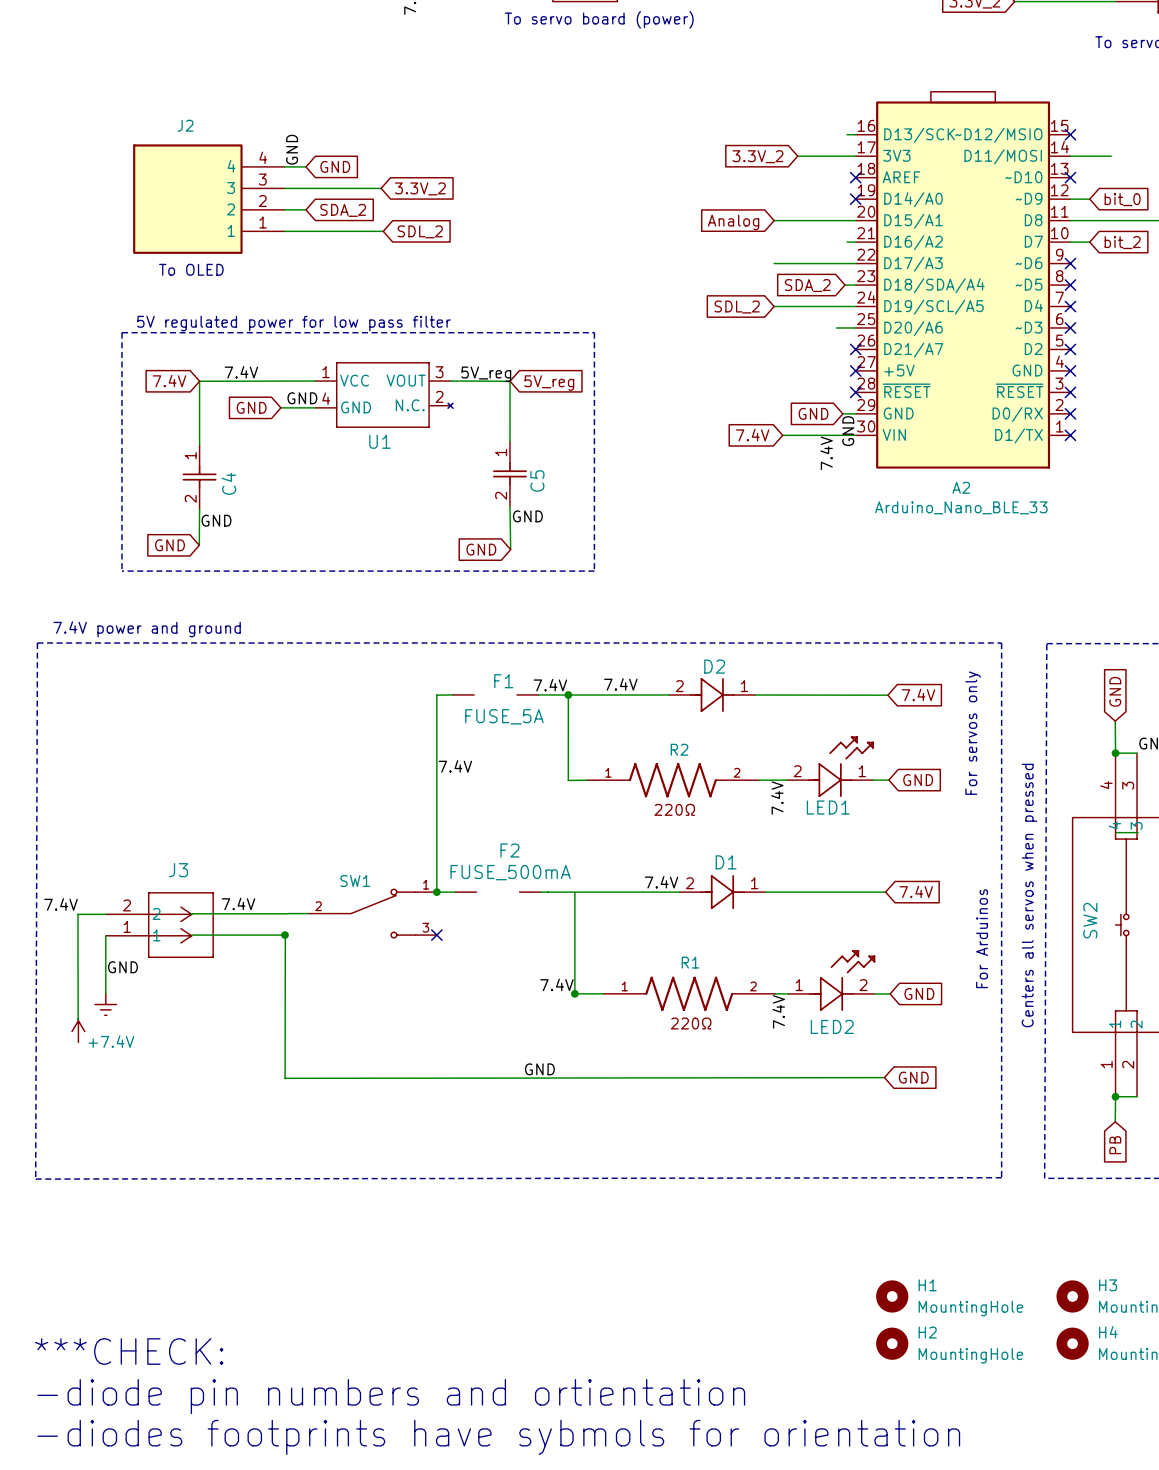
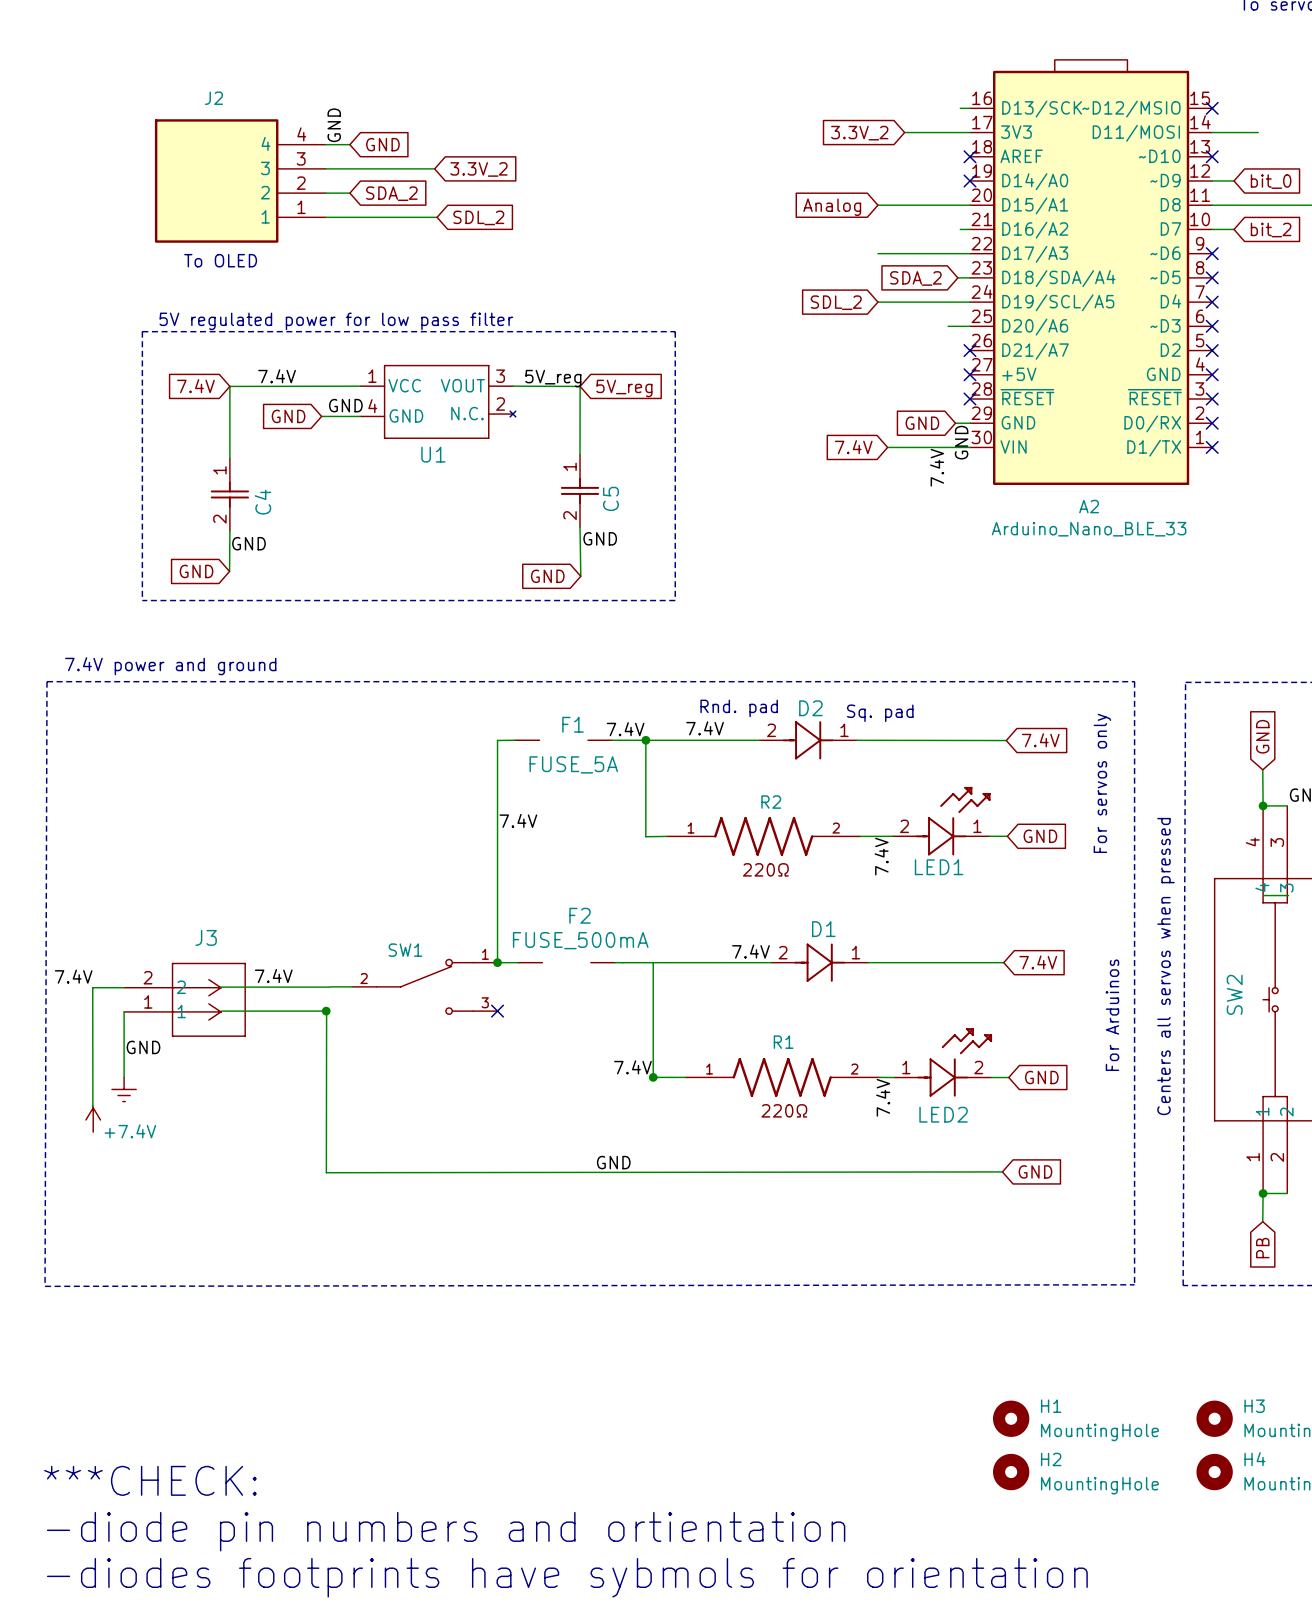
text: none -> Rnd. pad (739, 708)
text: none -> Sq. pad (880, 713)

